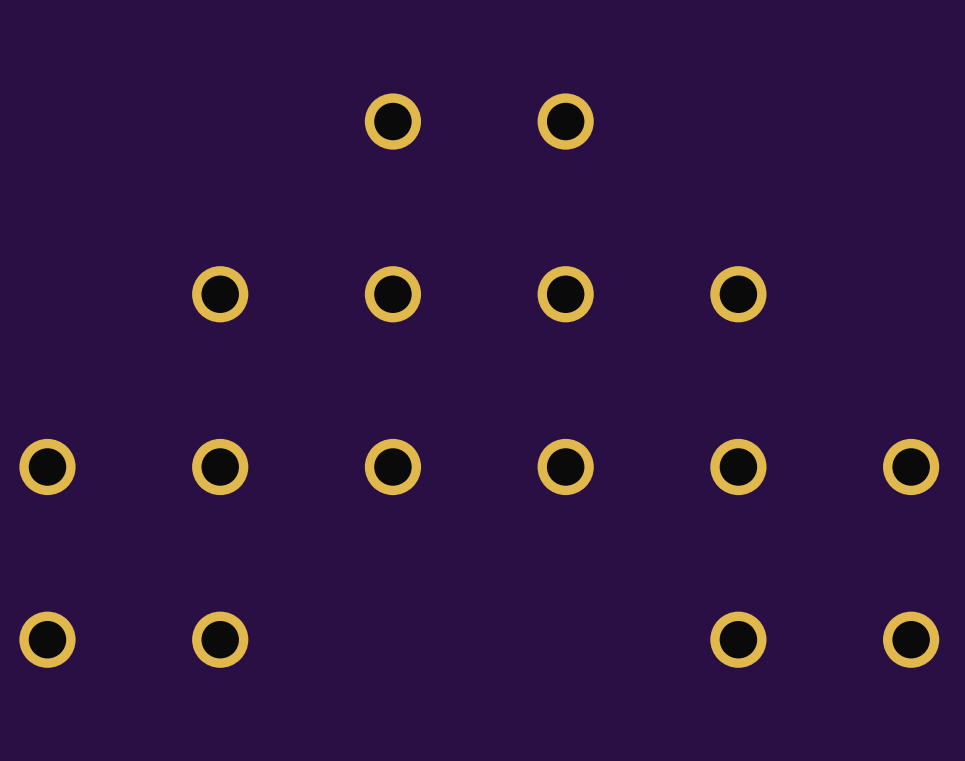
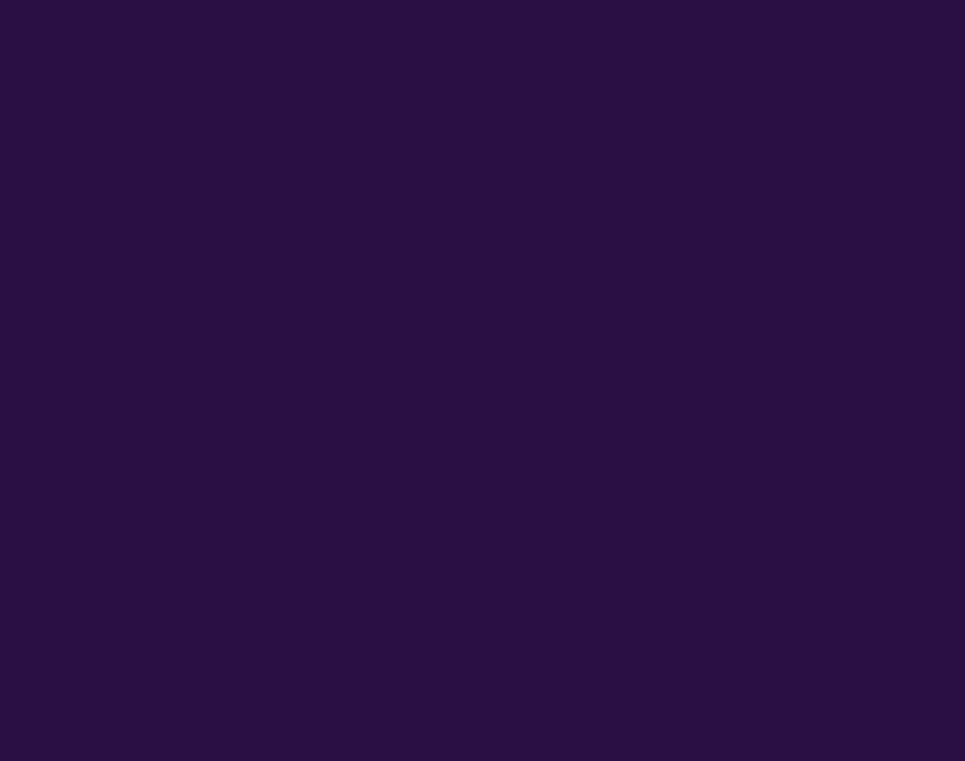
part: (392, 121) -> none
part: (565, 121) -> none
part: (220, 294) -> none
part: (392, 294) -> none
part: (565, 294) -> none
part: (738, 294) -> none
part: (47, 466) -> none
part: (220, 466) -> none
part: (392, 466) -> none
part: (565, 466) -> none
part: (738, 466) -> none
part: (911, 466) -> none
part: (47, 639) -> none
part: (220, 639) -> none
part: (738, 639) -> none
part: (911, 639) -> none

